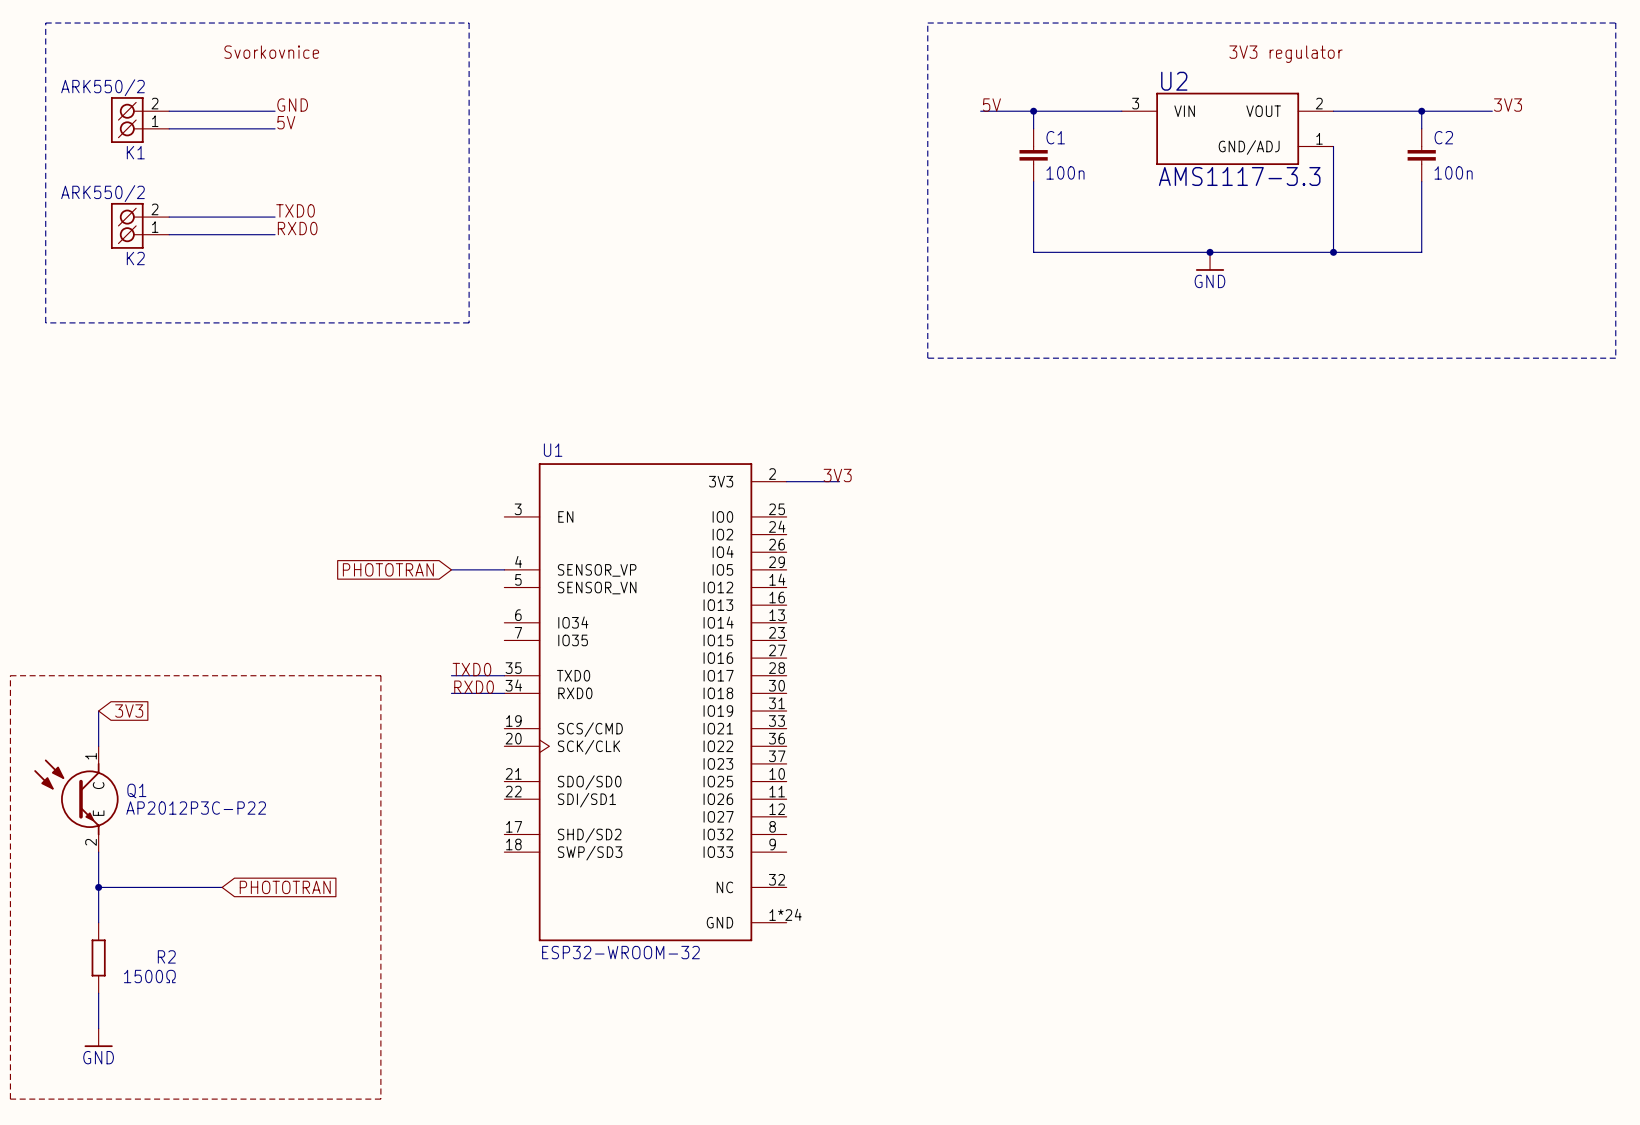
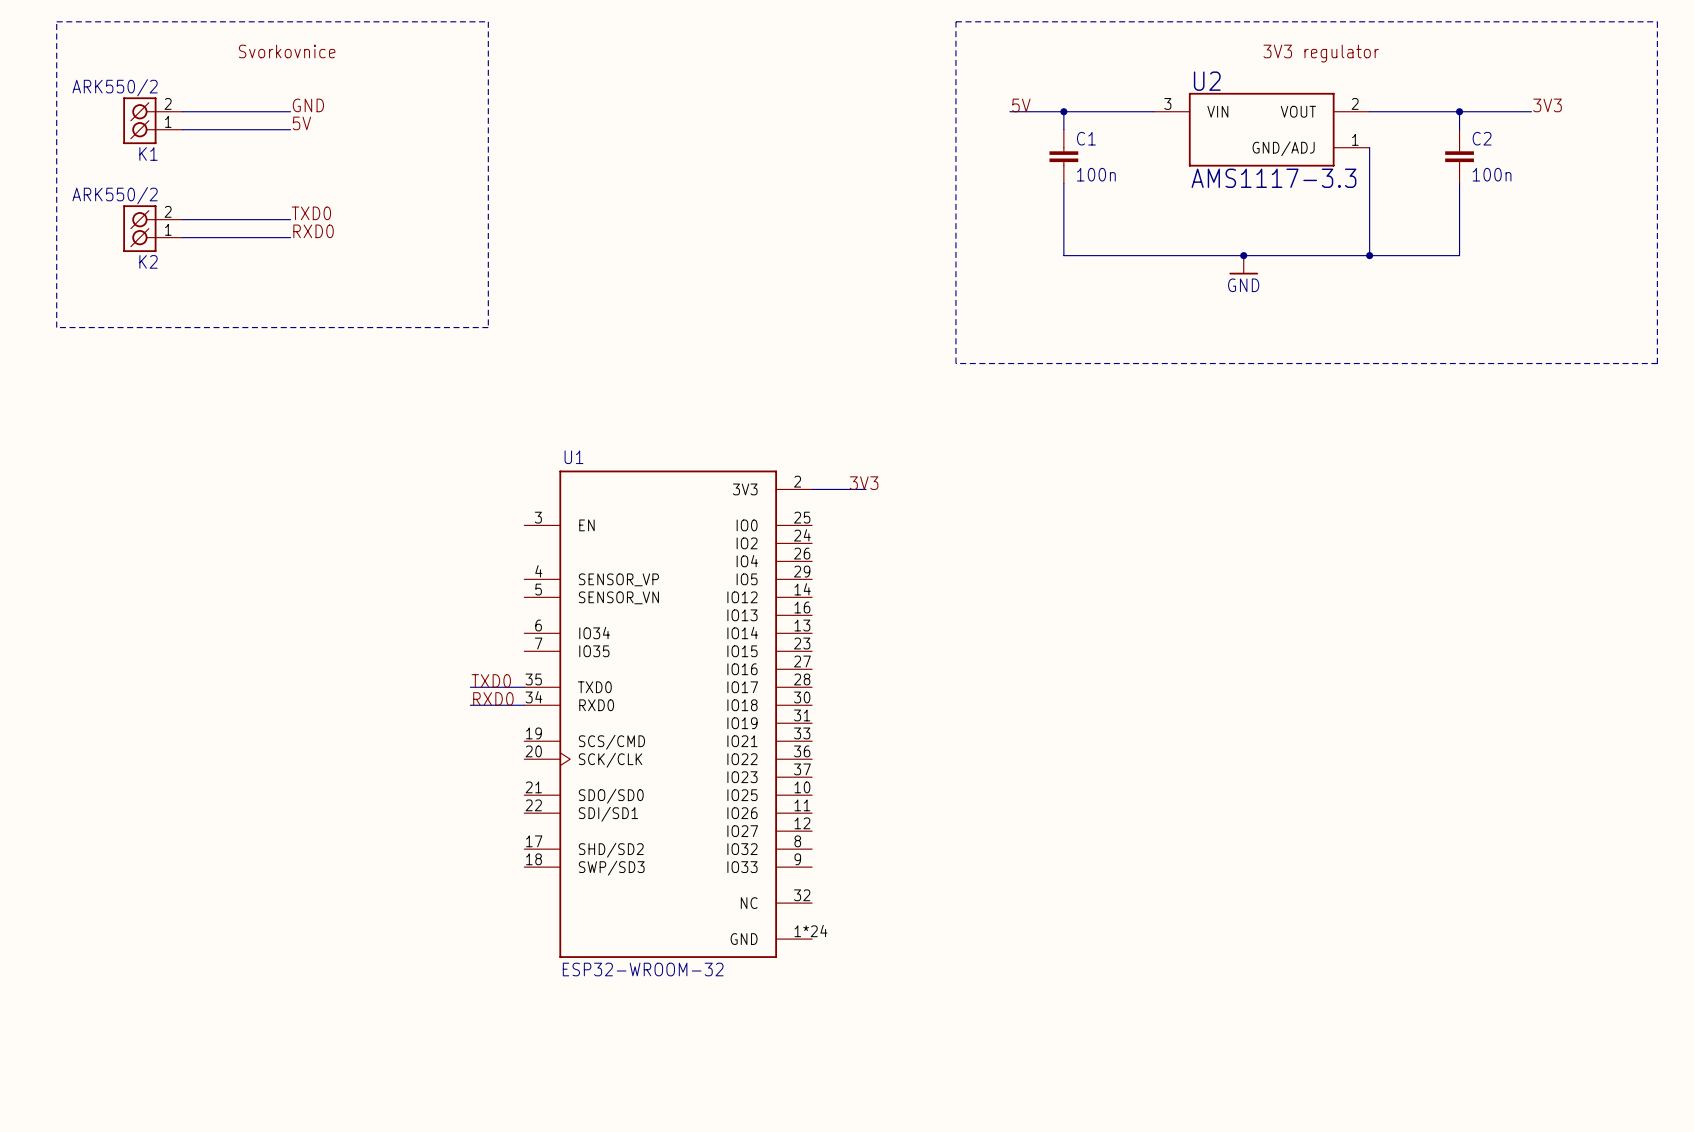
global label: PHOTOTRAN (388, 569) -> none
wire: (451, 569) (504, 569) -> none
line: (10, 675) (10, 1099) (380, 1099) (380, 675) (10, 675) -> none
wire: (98, 711) (98, 746) -> none
global label: 3V3 (129, 711) -> none
Q1: AP2012P3C-P22 (76, 799) -> none
wire: (98, 852) (98, 922) -> none
wire: (98, 887) (222, 887) -> none
junction: (98, 887) -> none
global label: PHOTOTRAN (285, 887) -> none
R2: 1500Ω (98, 957) -> none
wire: (98, 993) (98, 1028) -> none
power symbol: GND (98, 1037) -> none

